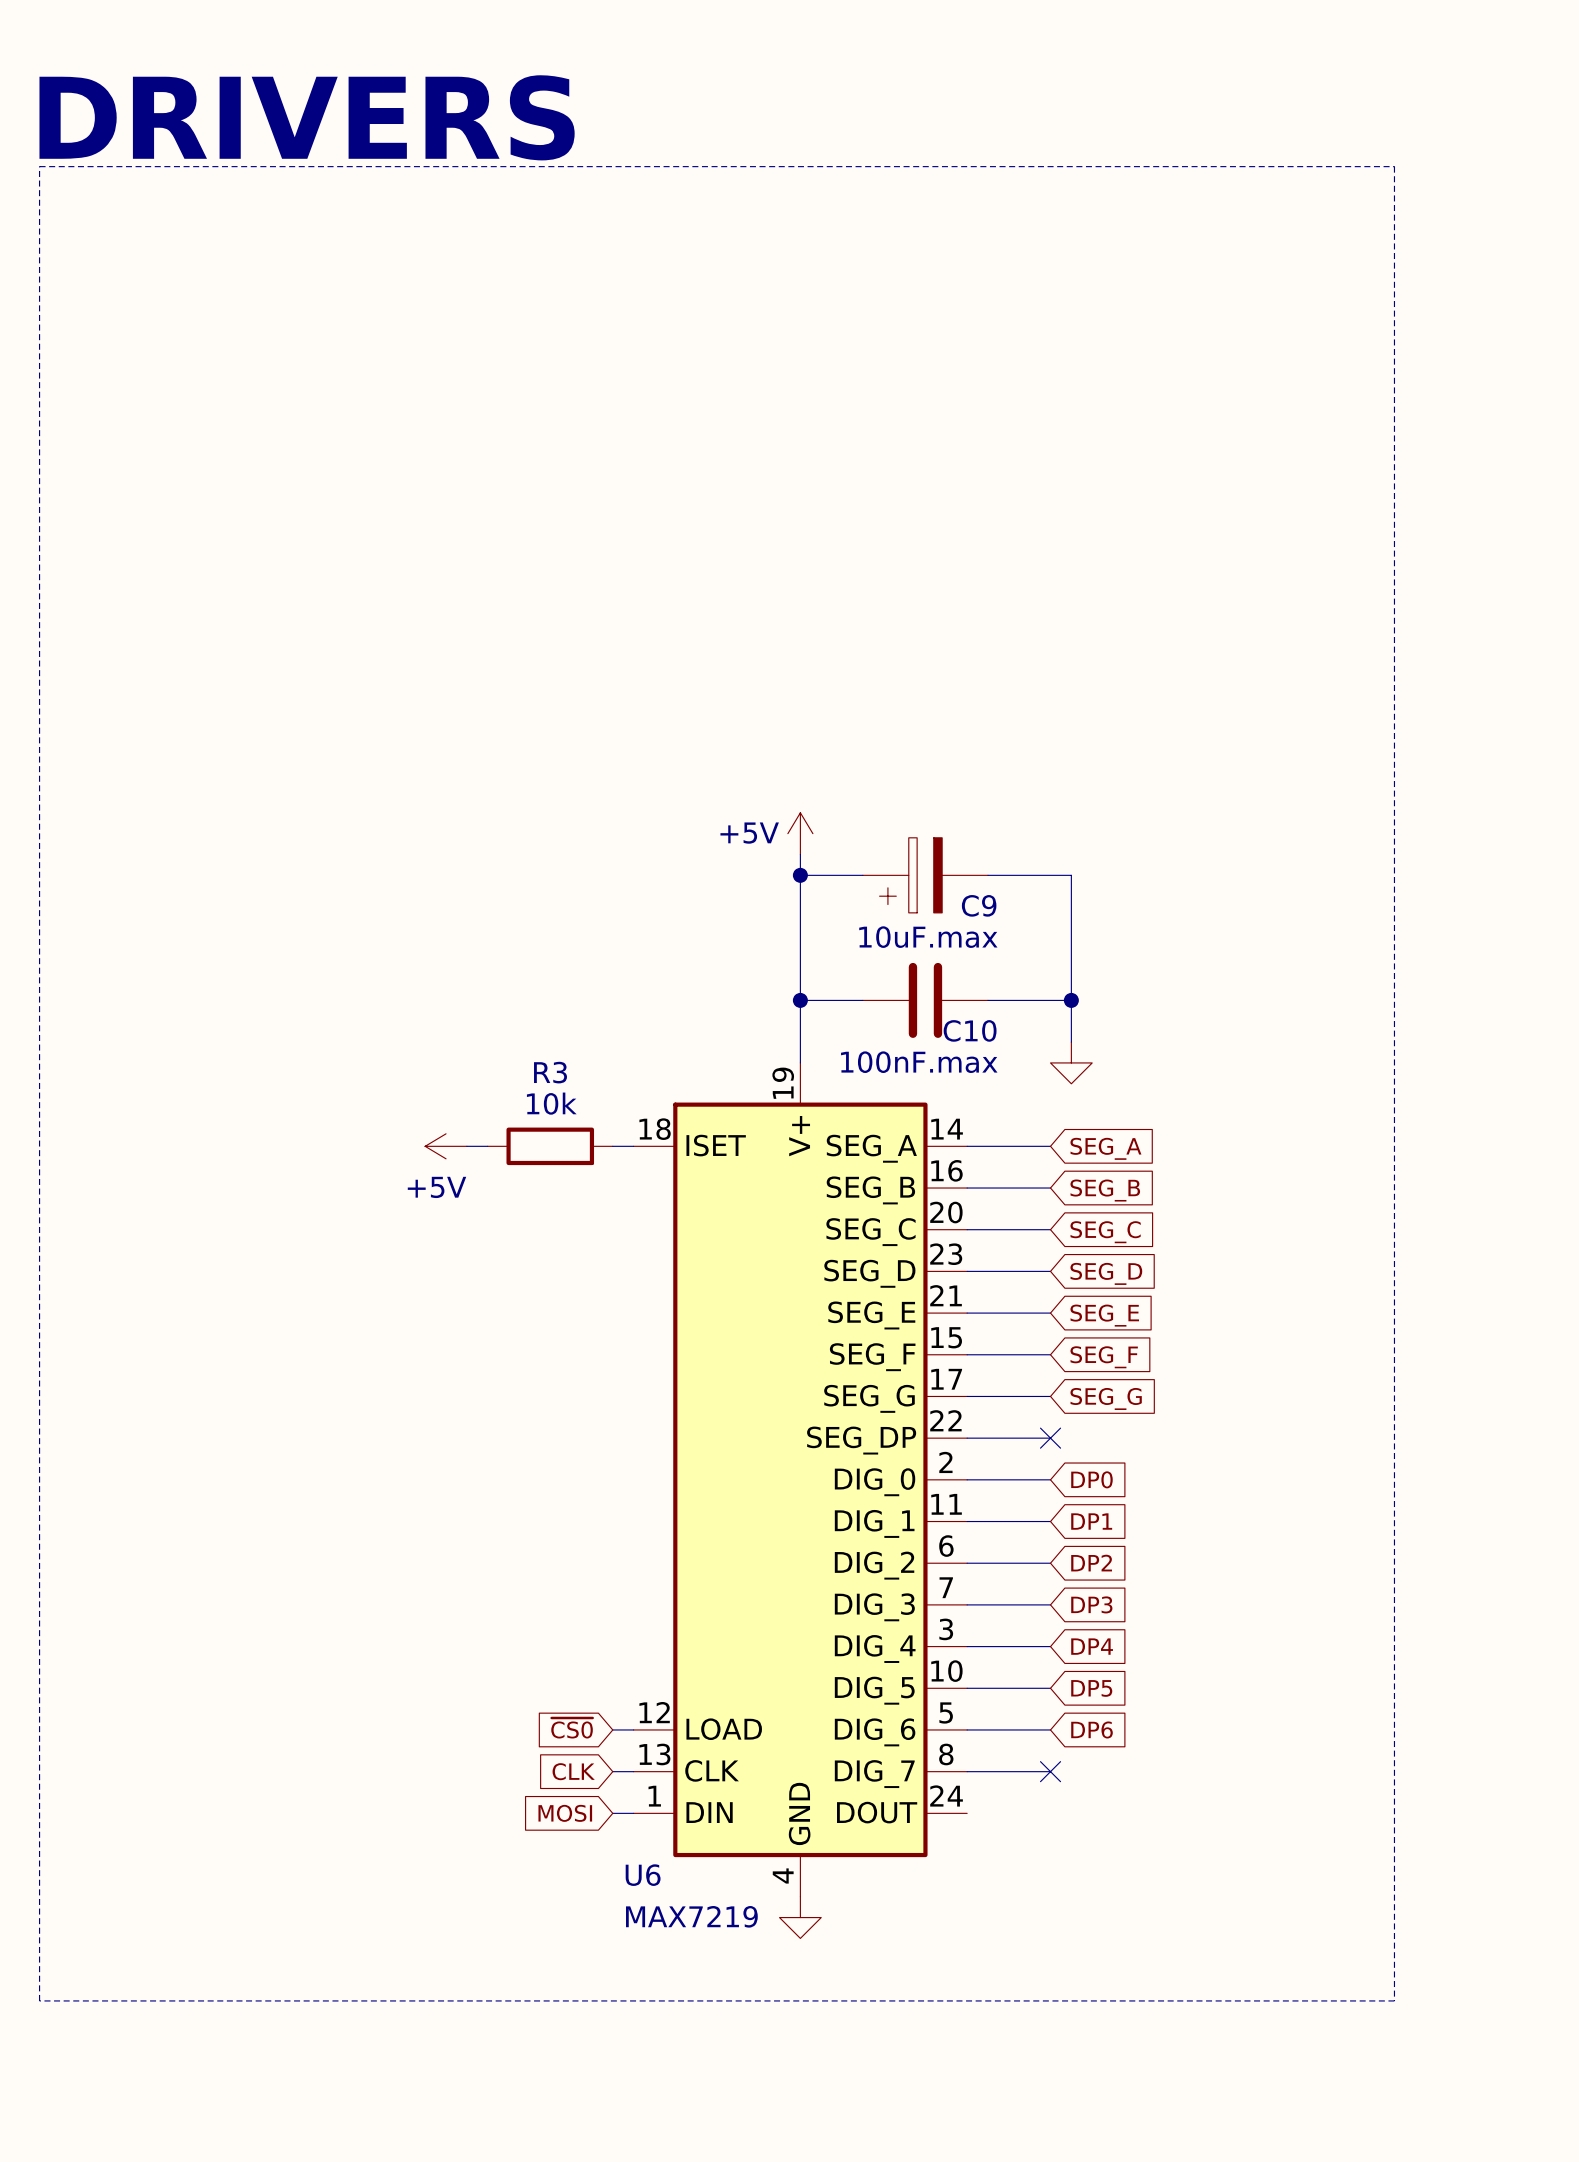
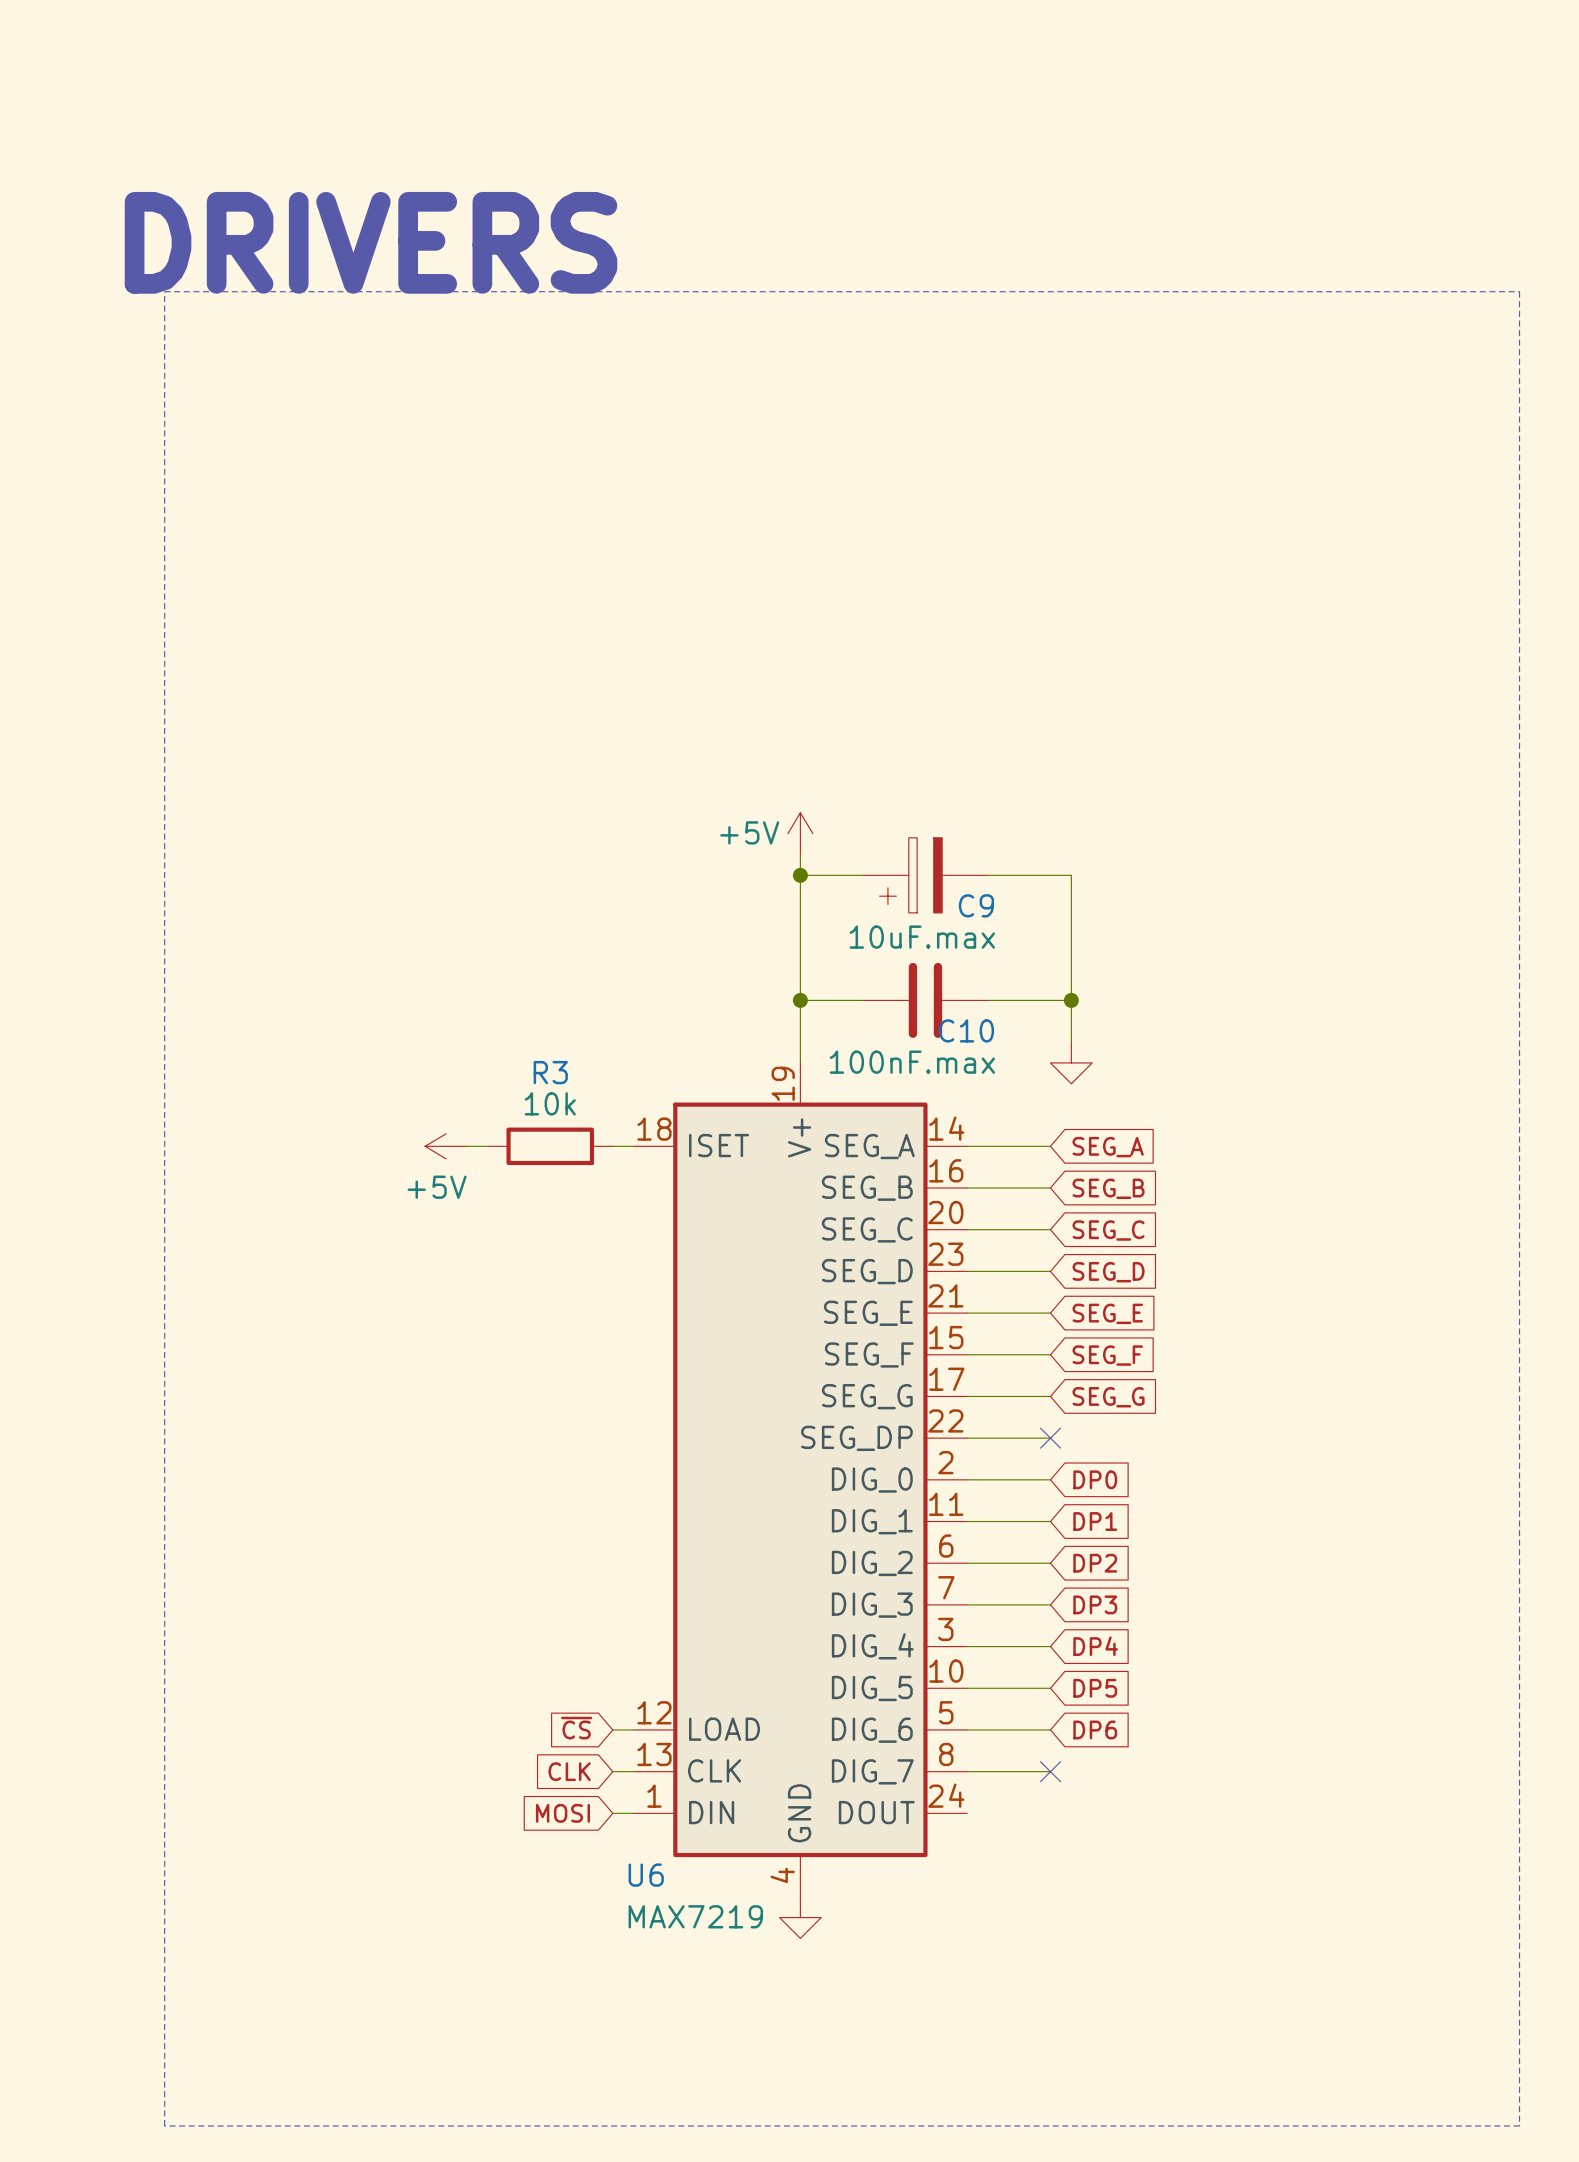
text position: DRIVERS (307, 117) -> DRIVERS (371, 242)
line: (39, 166) (1394, 166) (1394, 2000) (39, 2000) (39, 166) -> (164, 291) (164, 2126) (1519, 2126) (1519, 291) (164, 291)
global label: ~{CS0} (572, 1728) -> ~{CS} (576, 1728)

